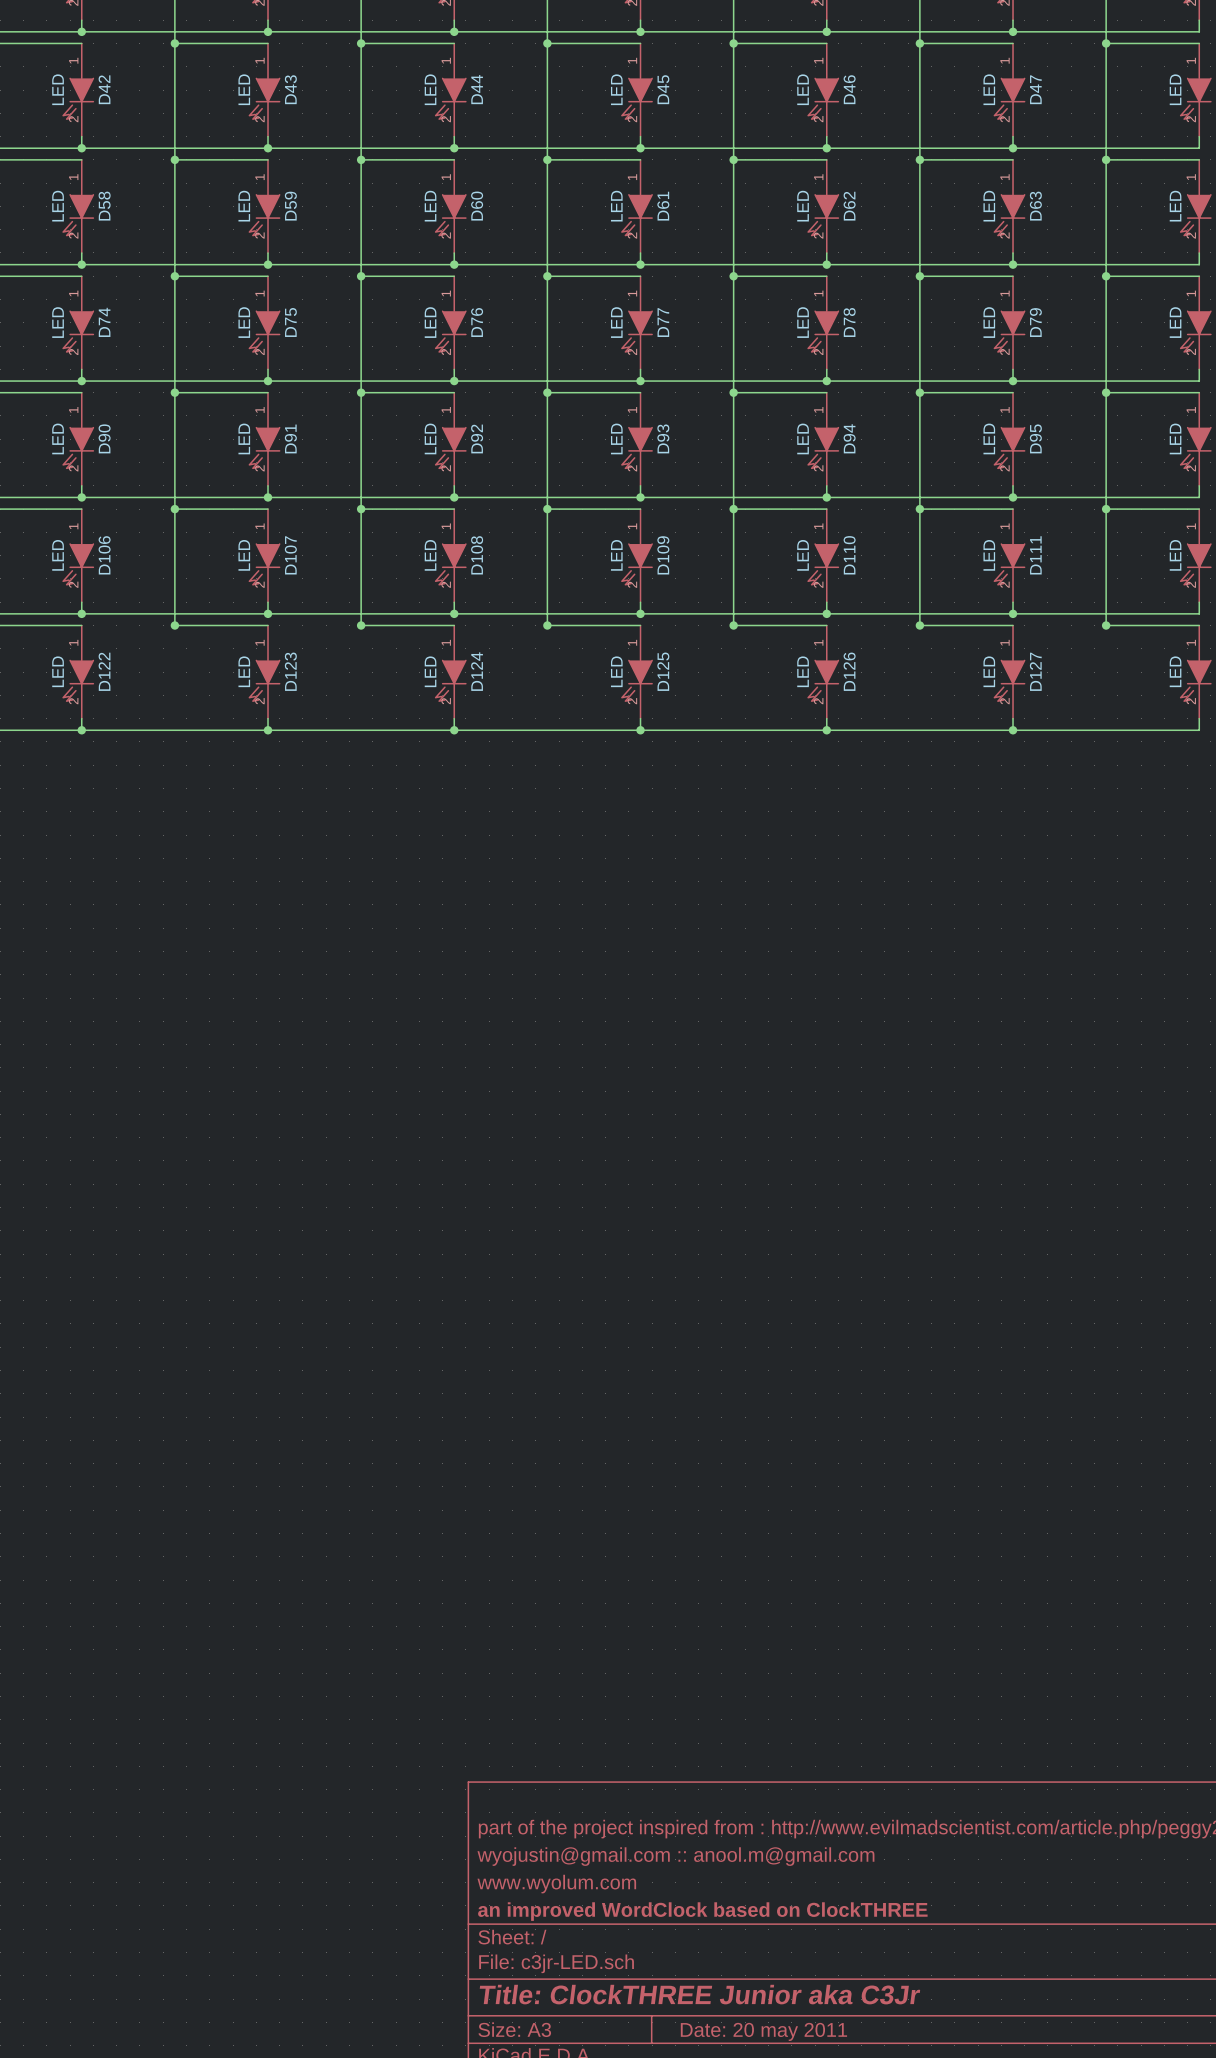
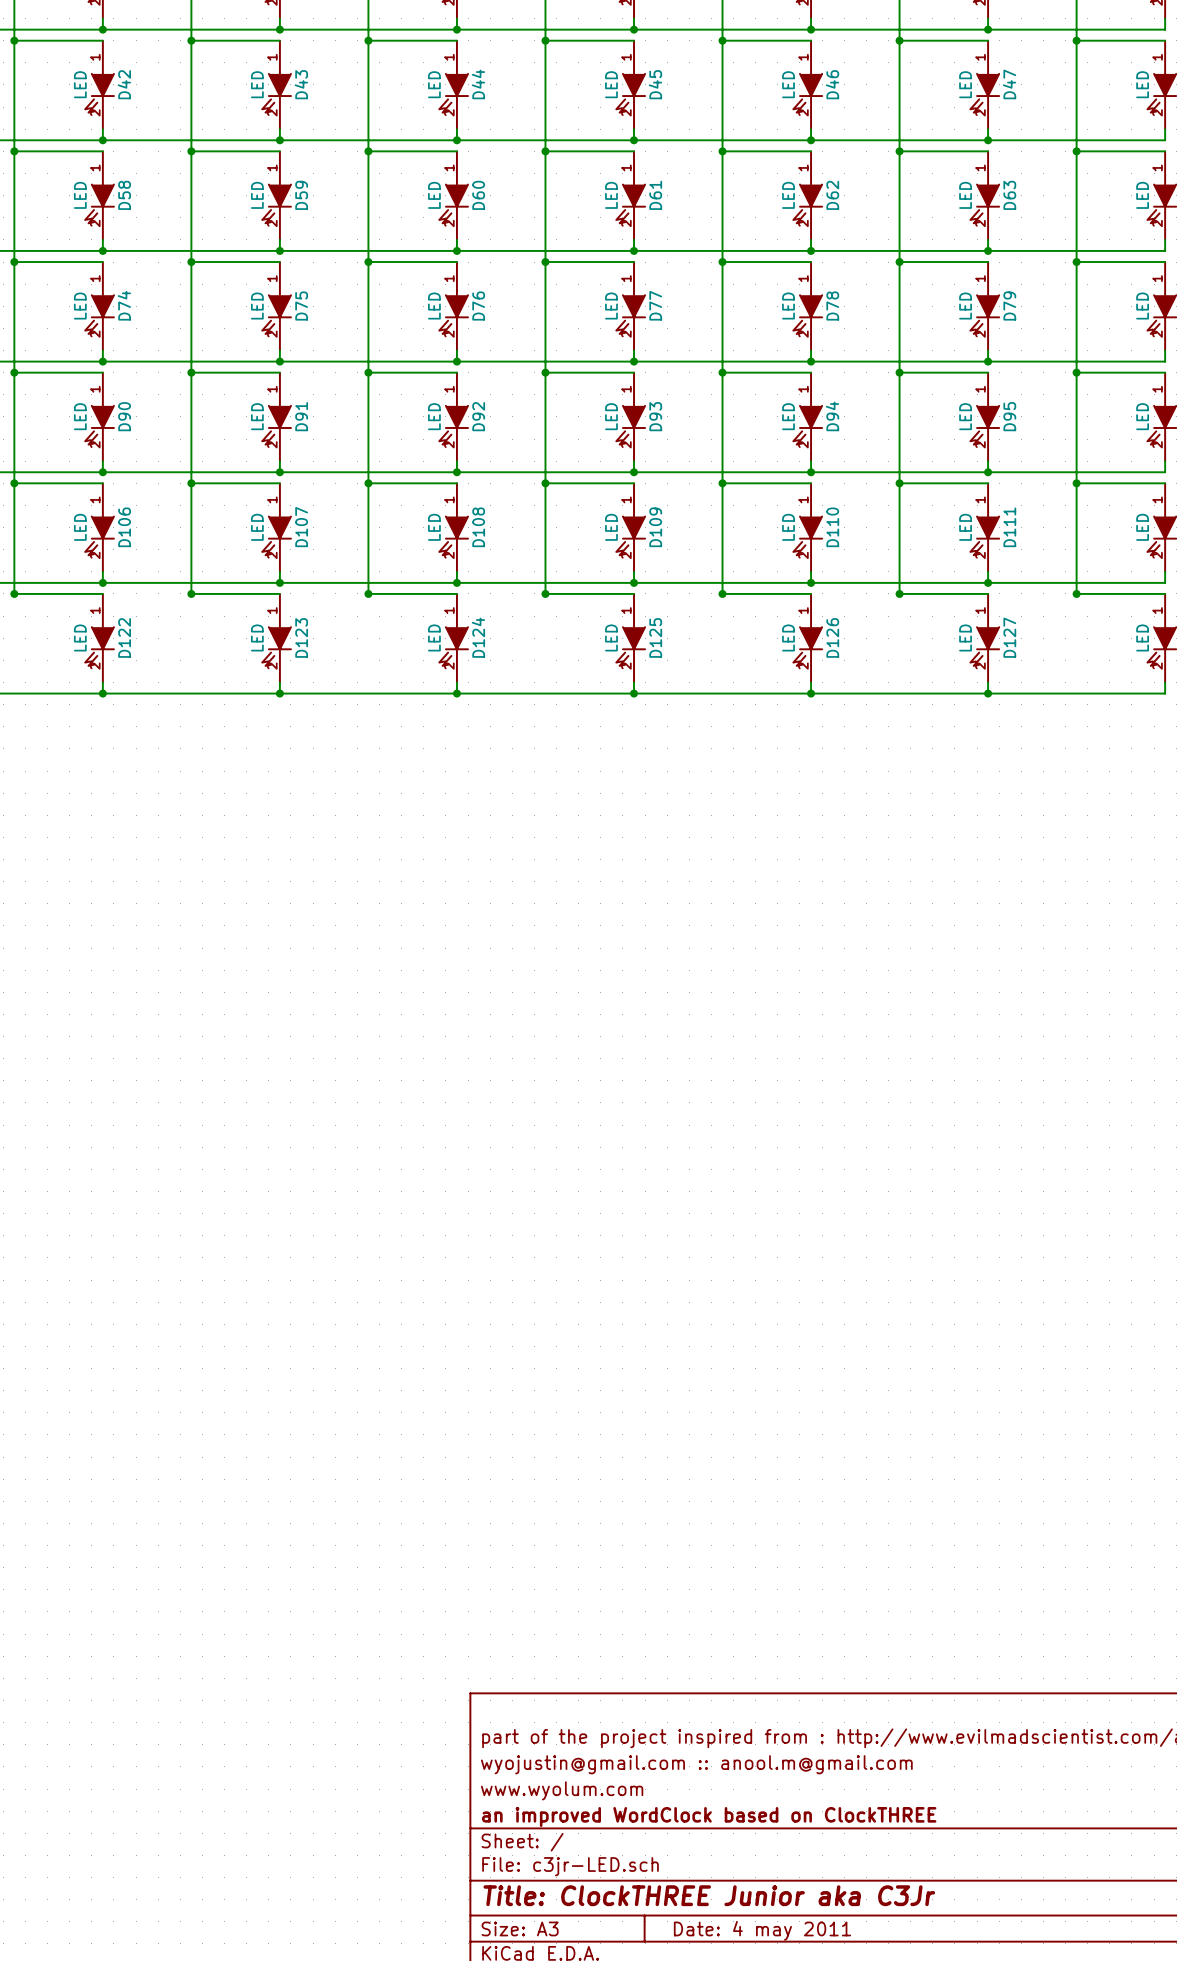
title block: Date: 20 may 2011 (763, 2031) -> Date: 4 may 2011 (762, 1930)

